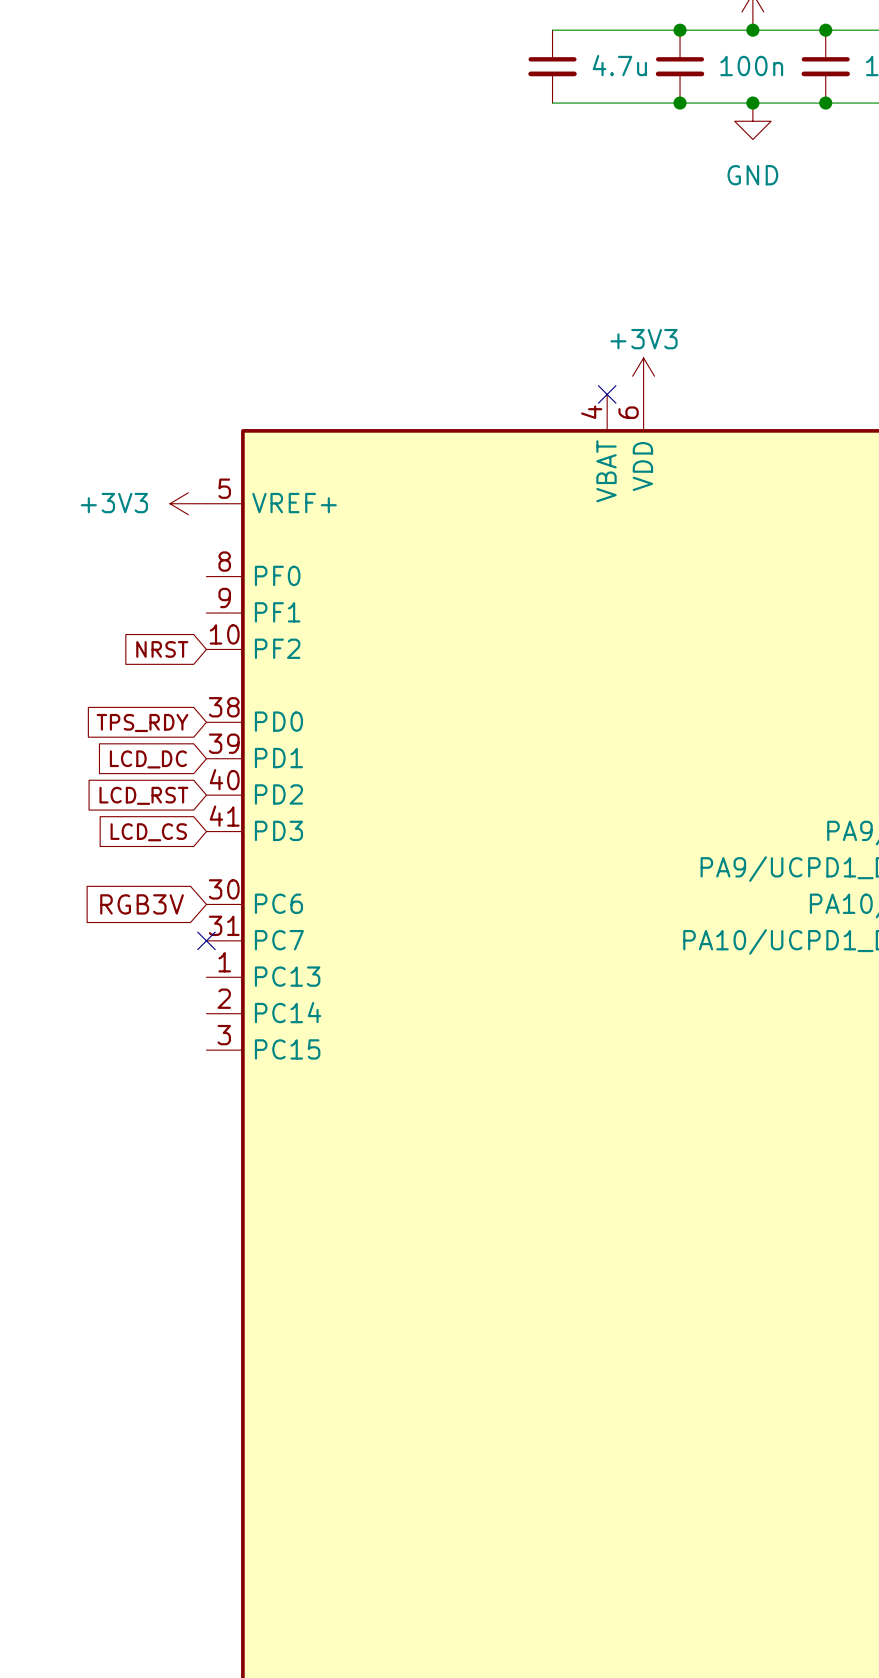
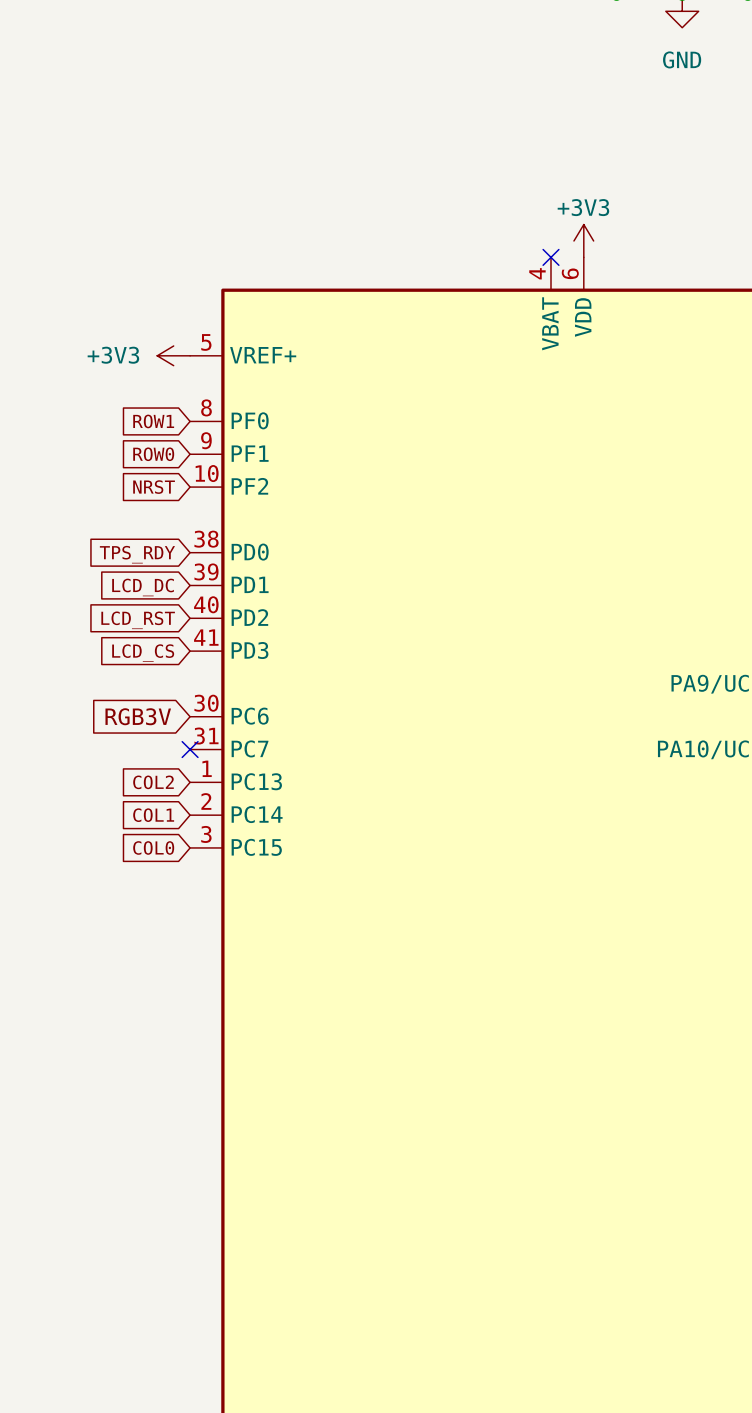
global label: none -> ROW1 (153, 421)
global label: none -> ROW0 (153, 454)
global label: none -> COL2 (153, 782)
global label: none -> COL1 (153, 815)
global label: none -> COL0 (153, 847)

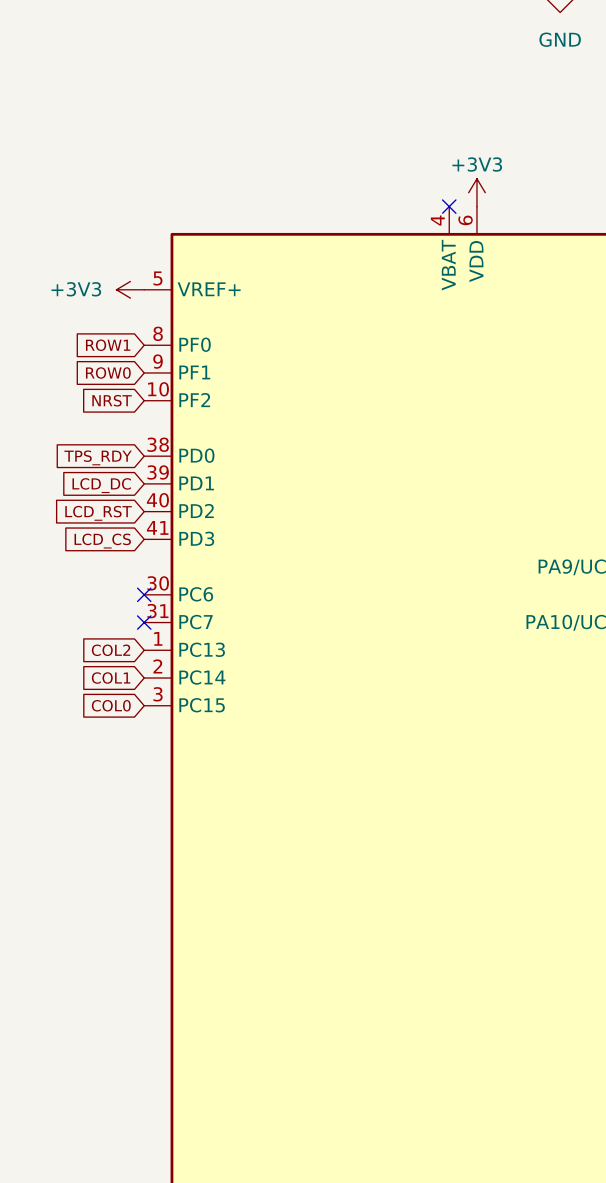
global label: RGB3V (138, 716) -> none
no-connect mark: none -> (144, 594)

